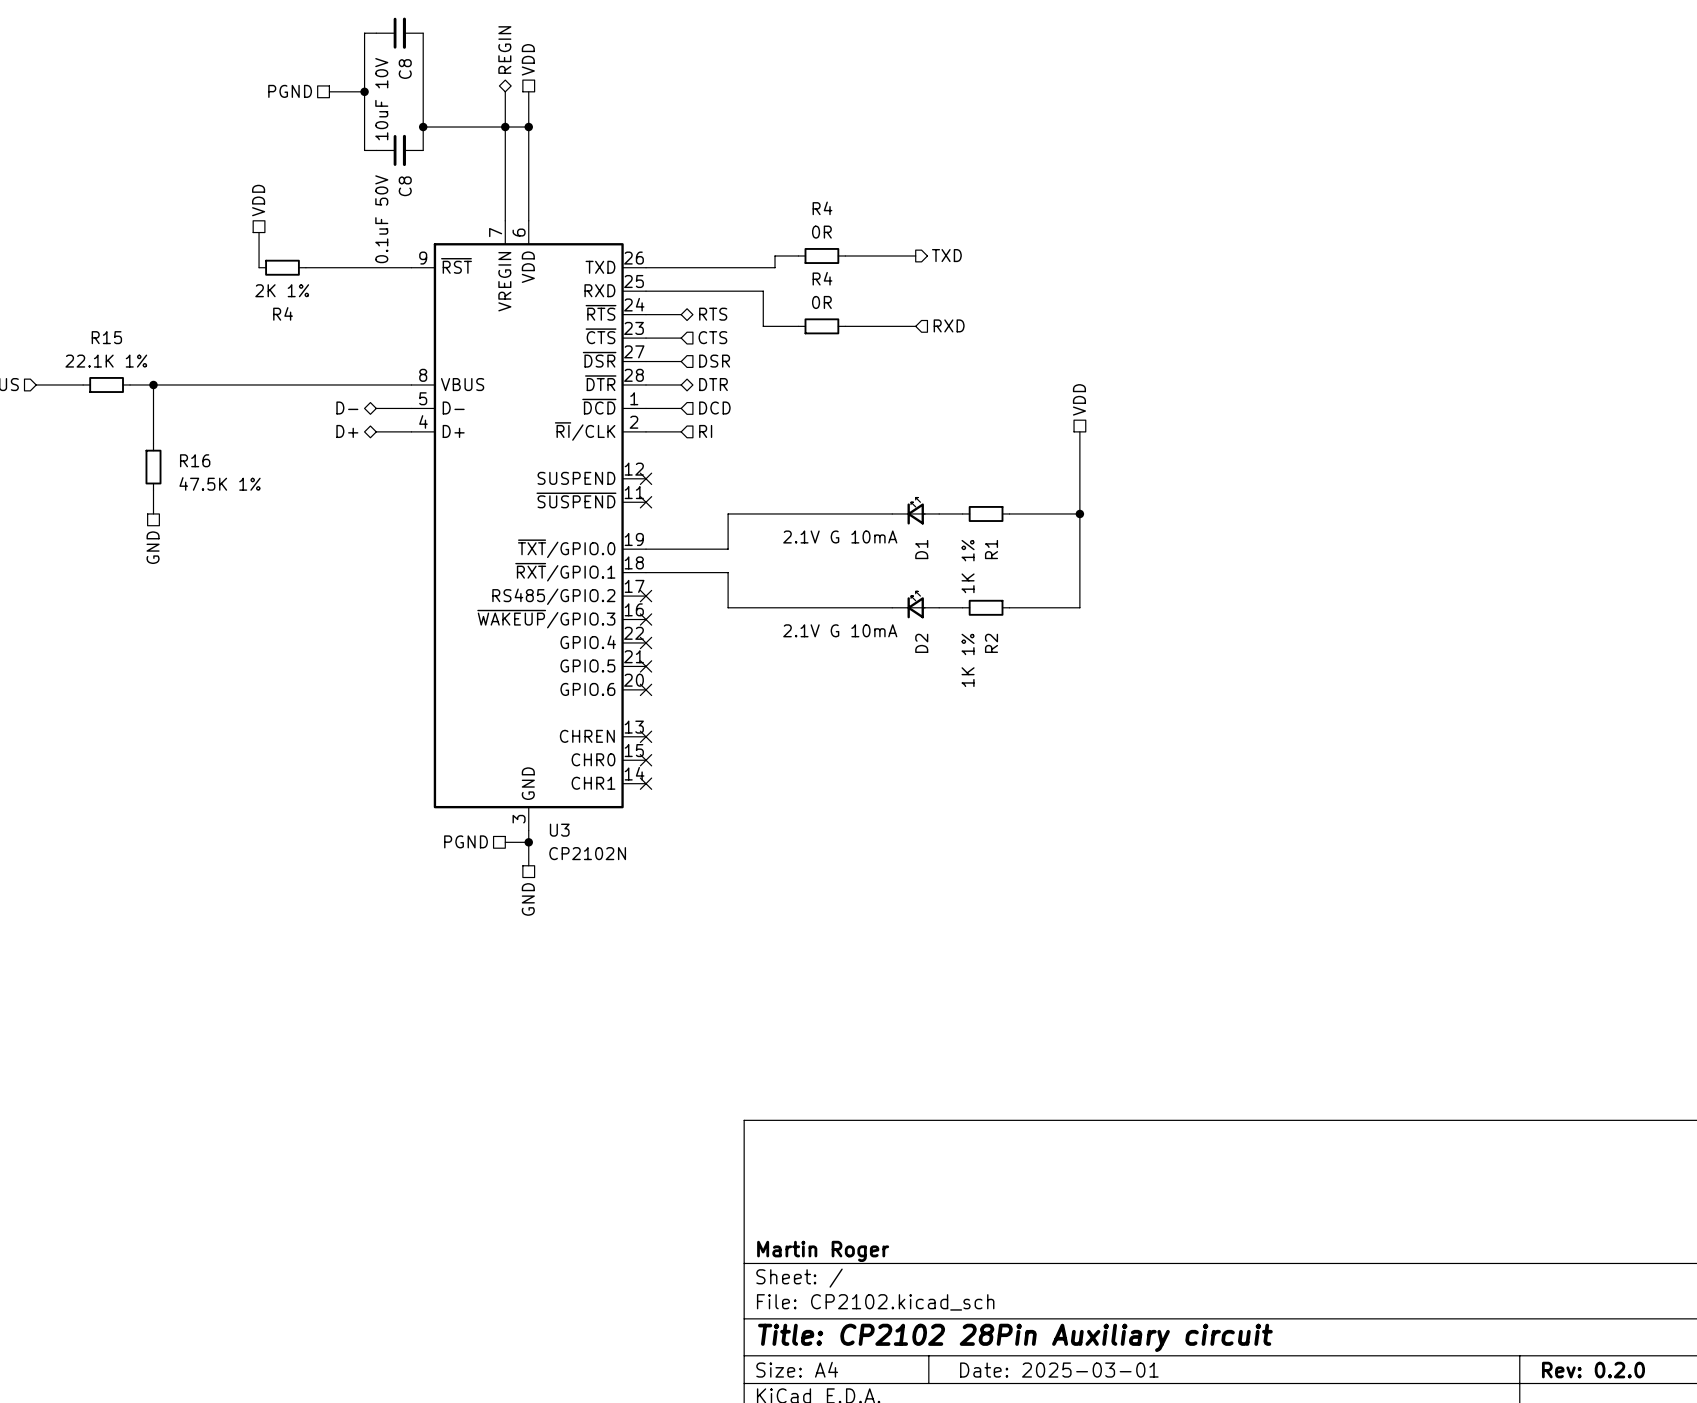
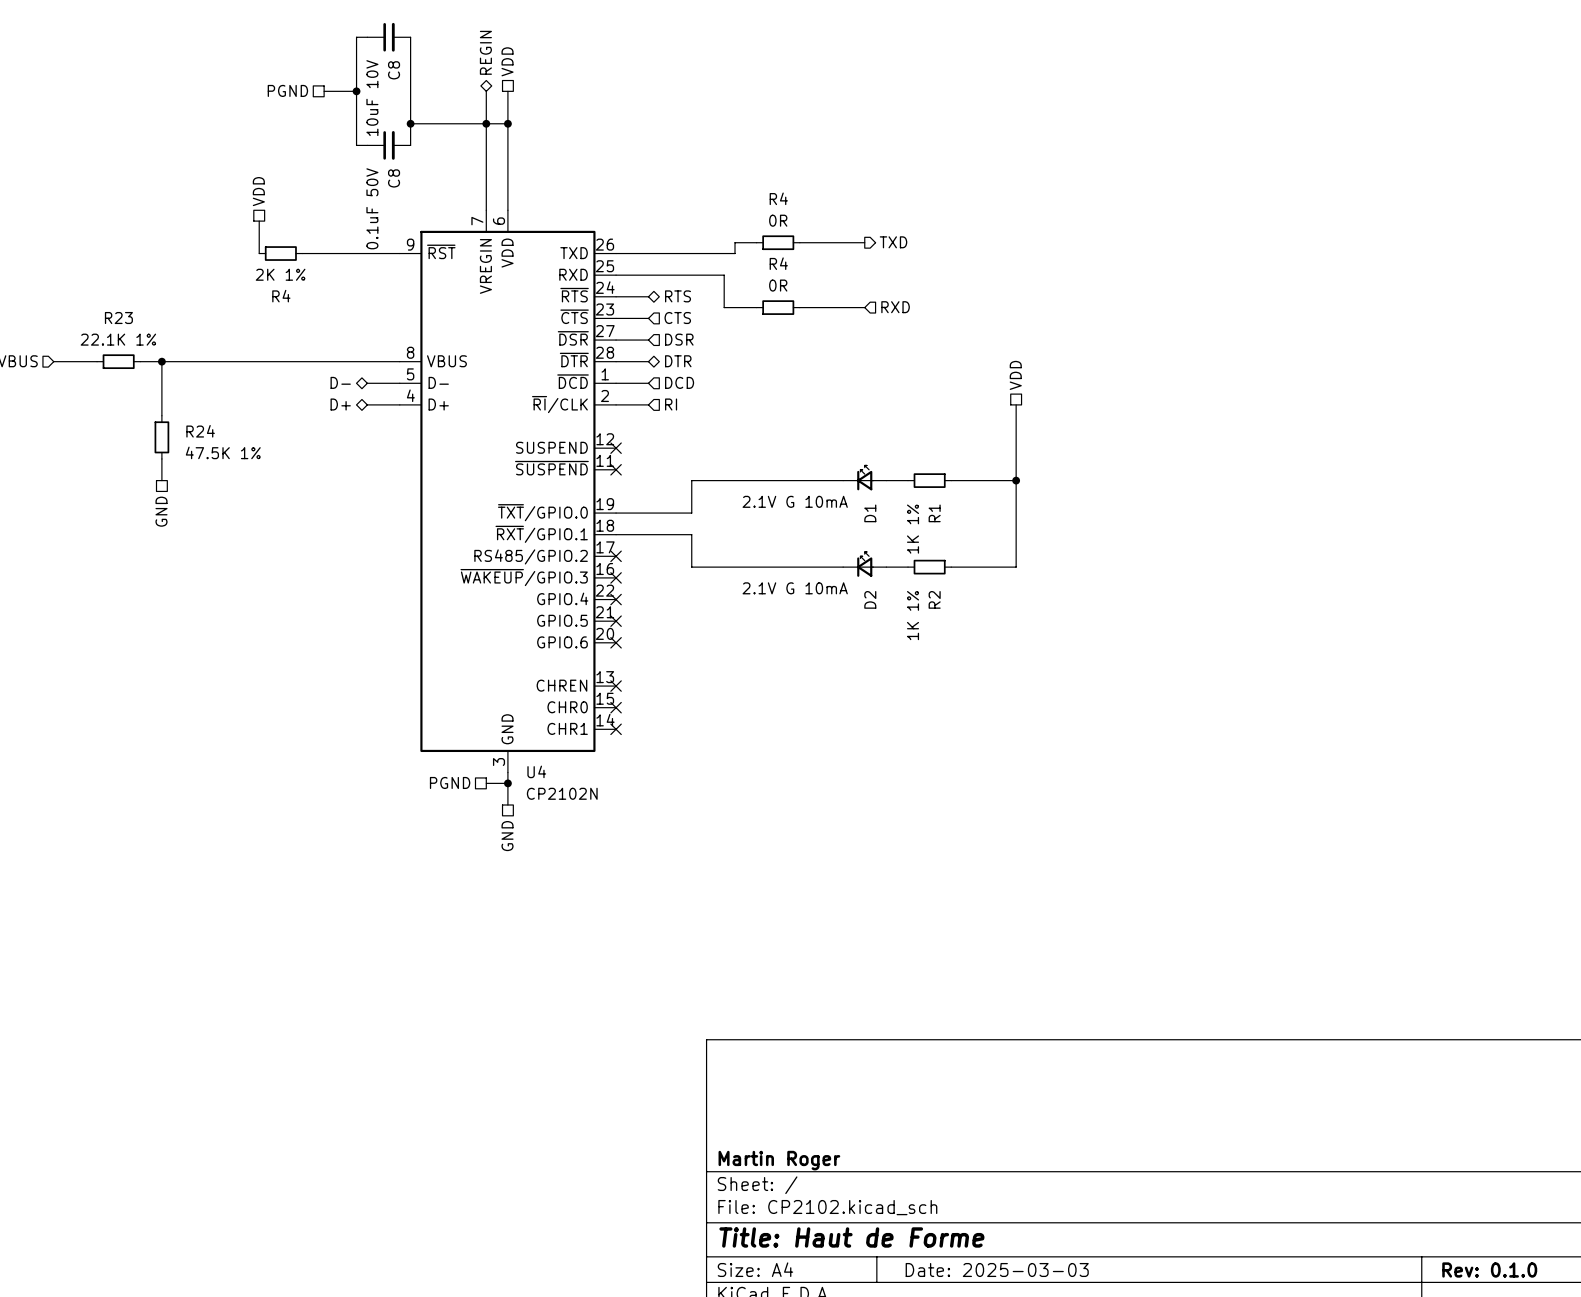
R15 name: R15 (106, 337) -> R23 (118, 318)
R16 name: R16 (195, 460) -> R24 (200, 431)
U3 name: U3 (559, 830) -> U4 (536, 771)
title block: Title: CP2102 28Pin Auxiliary circuit (1015, 1337) -> Title: Haut de Forme (851, 1237)
title block: Date: 2025-03-01 (1059, 1370) -> Date: 2025-03-03 (997, 1270)
title block: Rev: 0.2.0 (1593, 1370) -> Rev: 0.1.0 (1489, 1270)

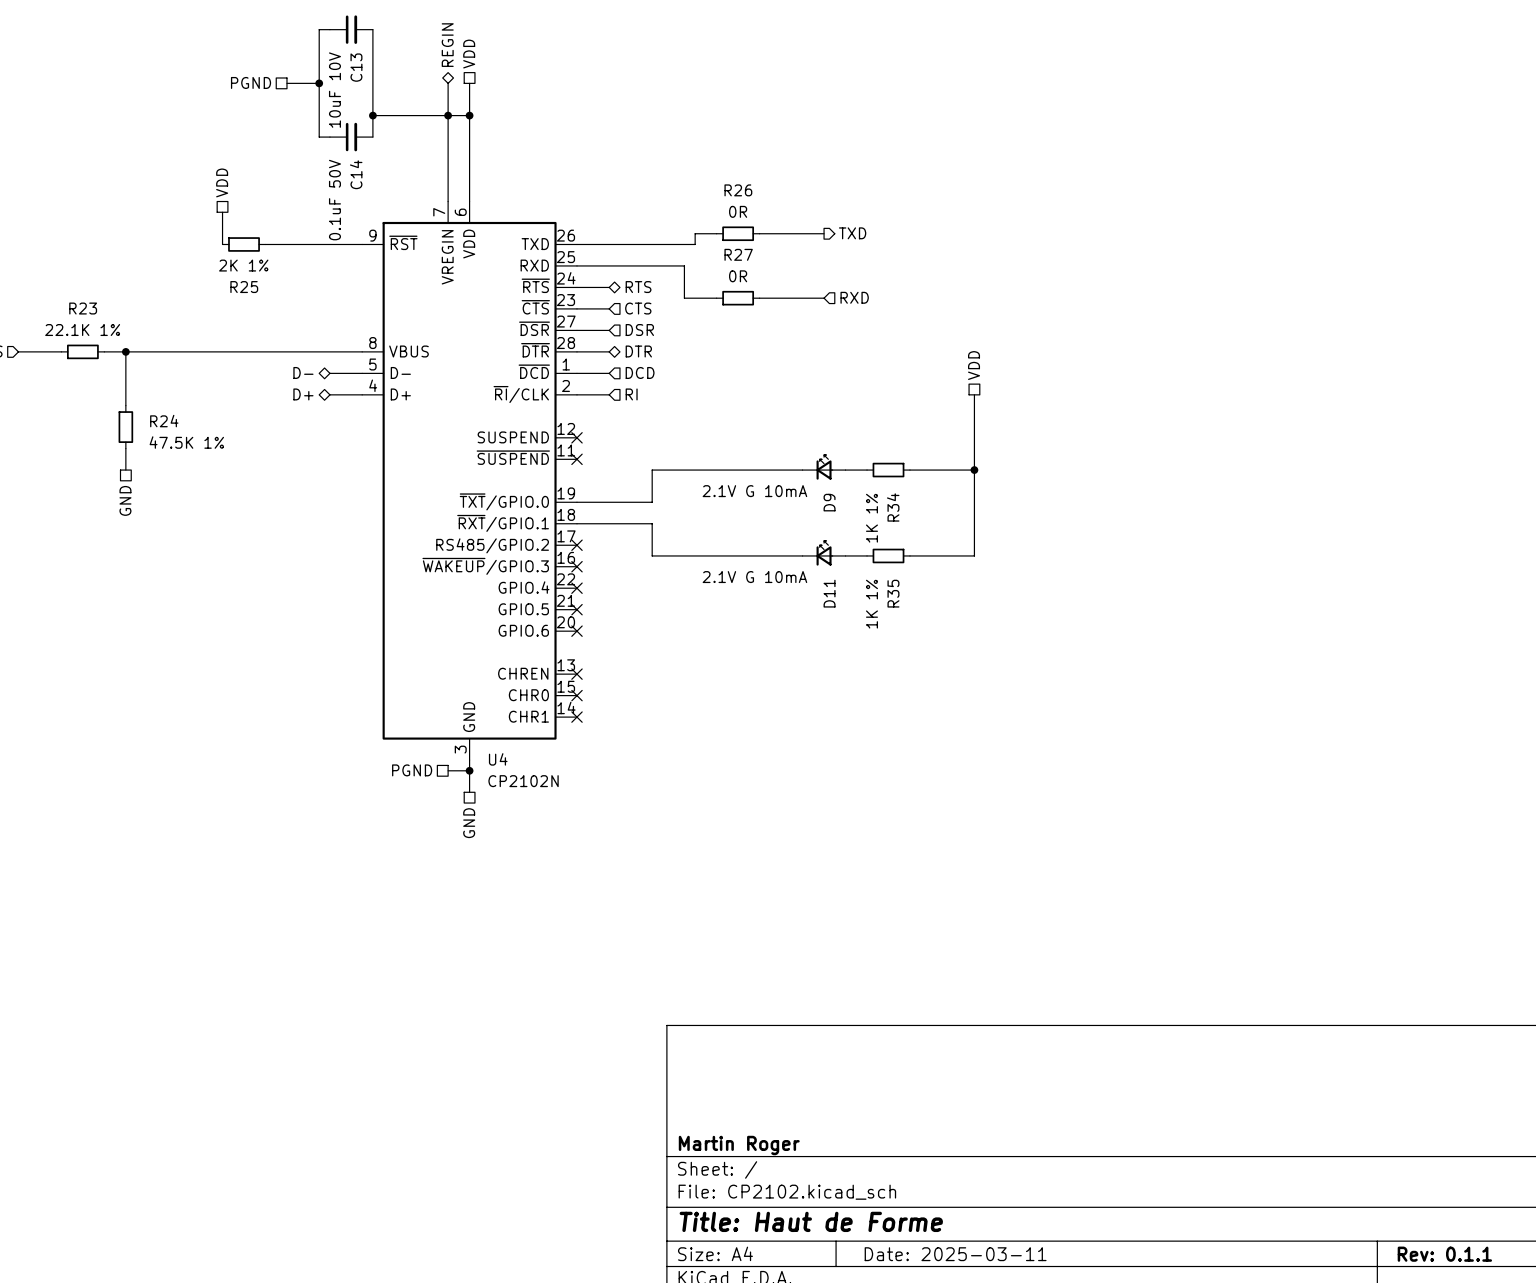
C8 name: C8 (394, 70) -> C13 (356, 67)
C8 name: C8 (394, 178) -> C14 (356, 174)
R4 name: R4 (778, 198) -> R26 (738, 190)
R4 name: R4 (778, 263) -> R27 (738, 254)
R4 name: R4 (281, 296) -> R25 (244, 287)
D1 name: D1 (870, 513) -> D9 (829, 502)
R1 name: R1 (934, 513) -> R34 (893, 507)
D2 name: D2 (870, 599) -> D11 (829, 593)
R2 name: R2 (934, 599) -> R35 (893, 593)
title block: Date: 2025-03-03 (997, 1270) -> Date: 2025-03-11 (955, 1254)
title block: Rev: 0.1.0 (1489, 1270) -> Rev: 0.1.1 (1444, 1254)

